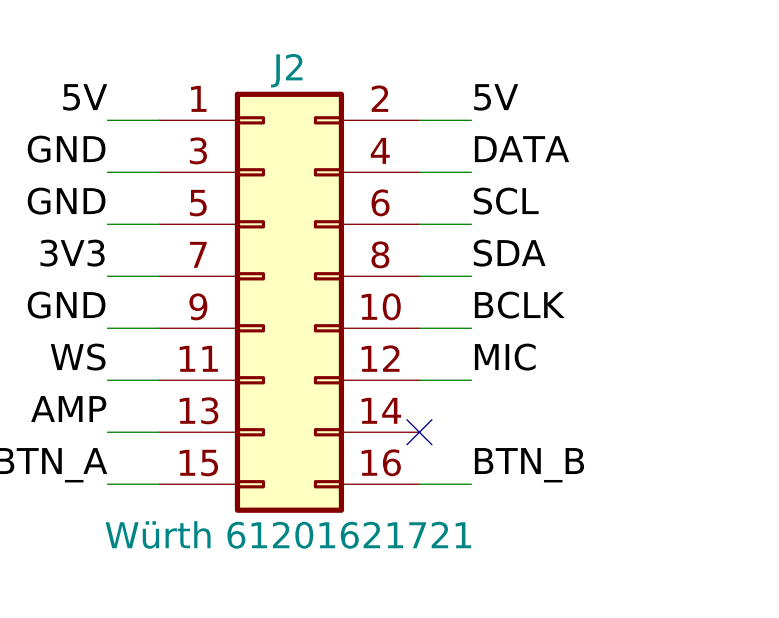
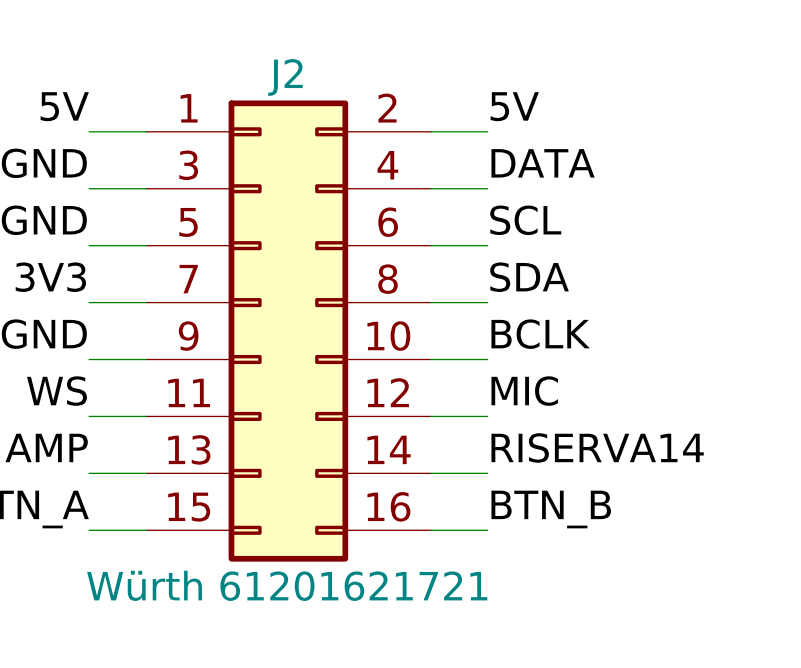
label: none -> RISERVA14 (597, 447)
wire: none -> (430, 473) (487, 473)
no-connect mark: (419, 432) -> none

